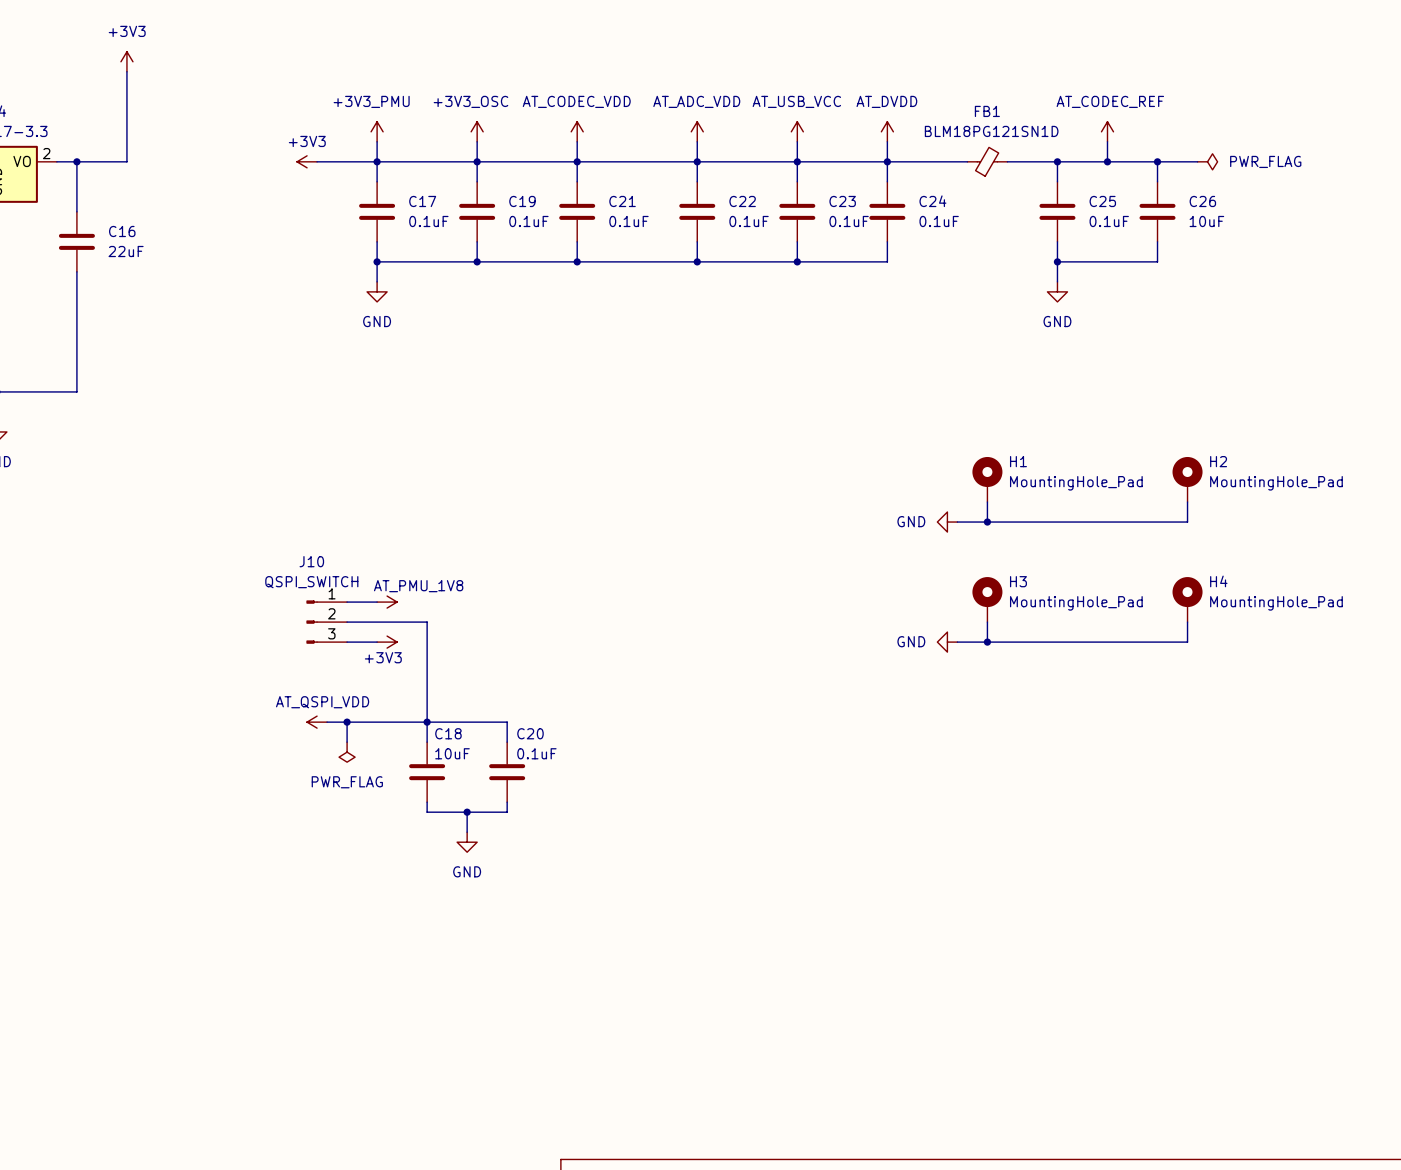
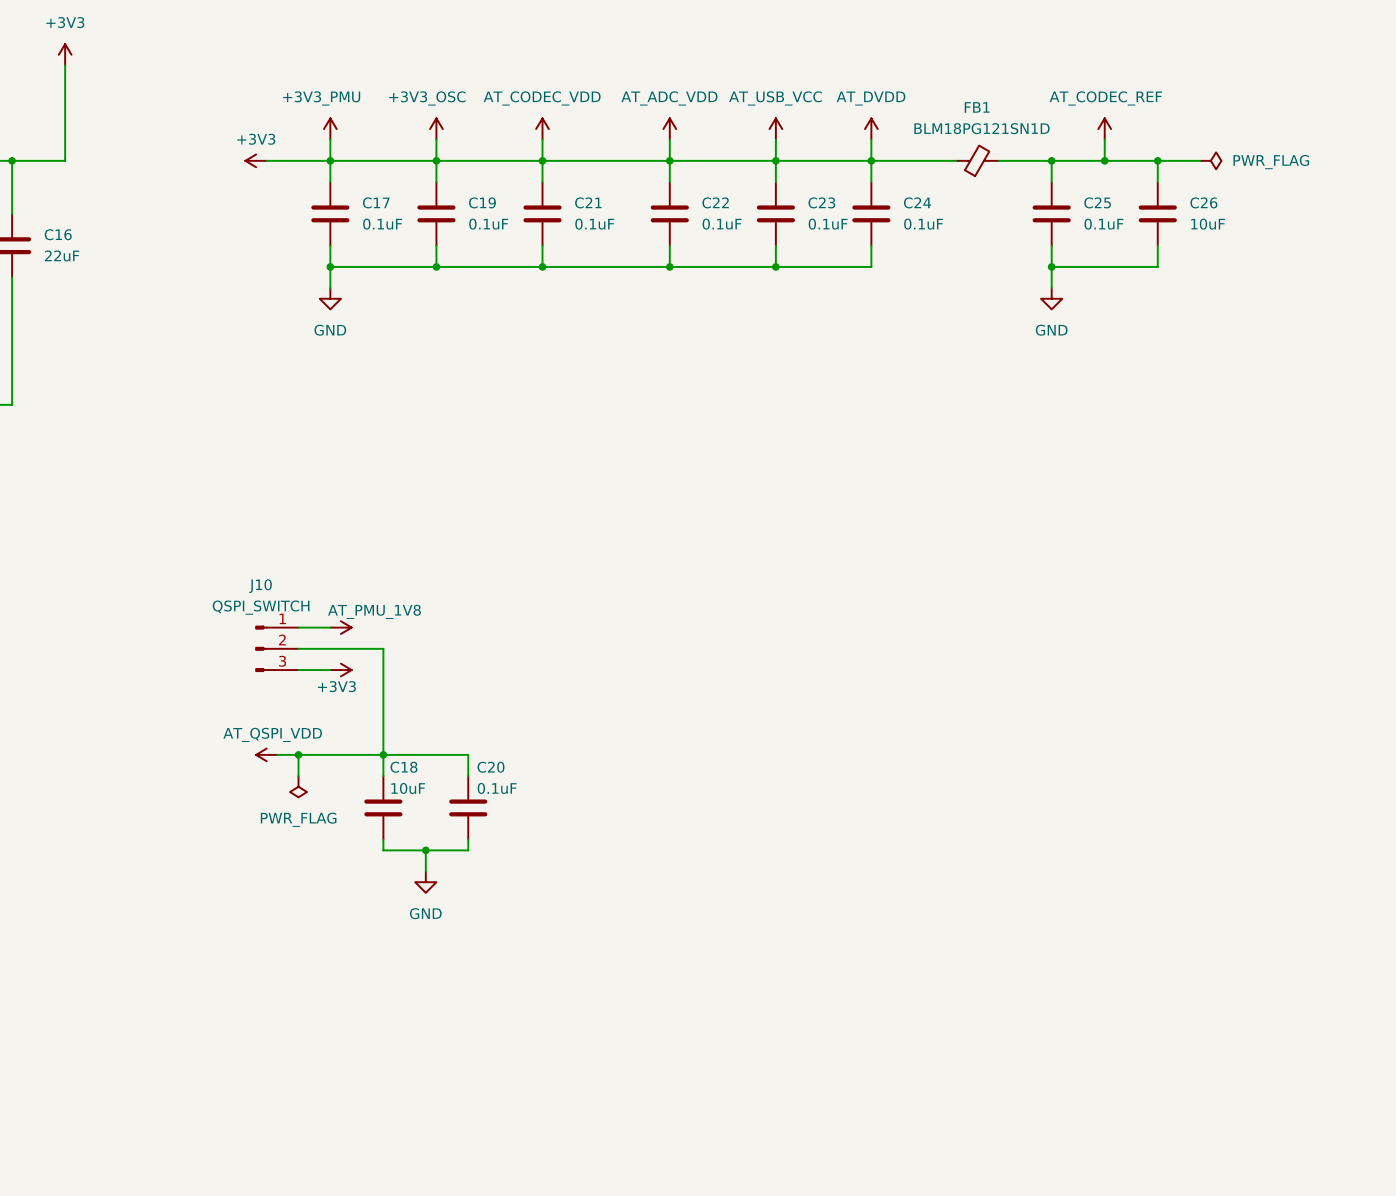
H1: MountingHole_Pad (987, 479) -> none
H2: MountingHole_Pad (1187, 479) -> none
wire: (987, 502) (987, 522) -> none
wire: (1187, 502) (1187, 522) (957, 522) -> none
power symbol: GND (947, 522) -> none
junction: (987, 522) -> none
H3: MountingHole_Pad (987, 599) -> none
H4: MountingHole_Pad (1187, 599) -> none
wire: (987, 622) (987, 642) -> none
wire: (1187, 622) (1187, 642) (957, 642) -> none
power symbol: GND (947, 642) -> none
junction: (987, 642) -> none

